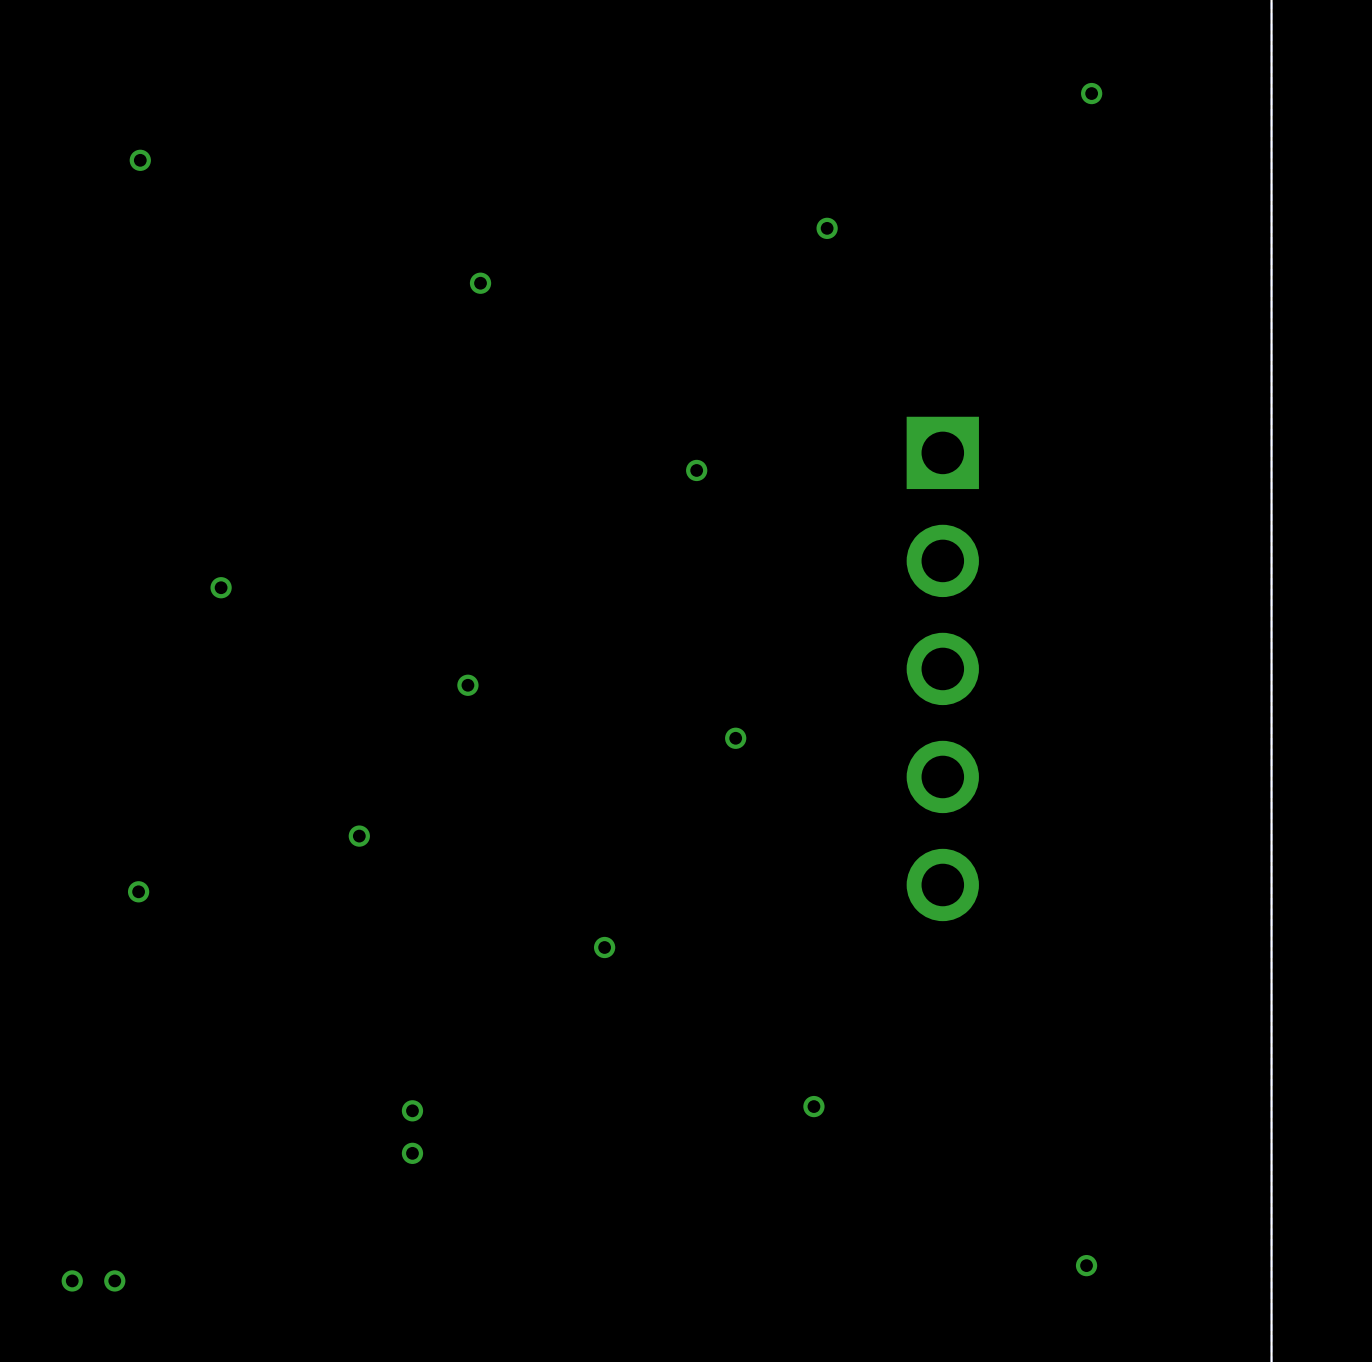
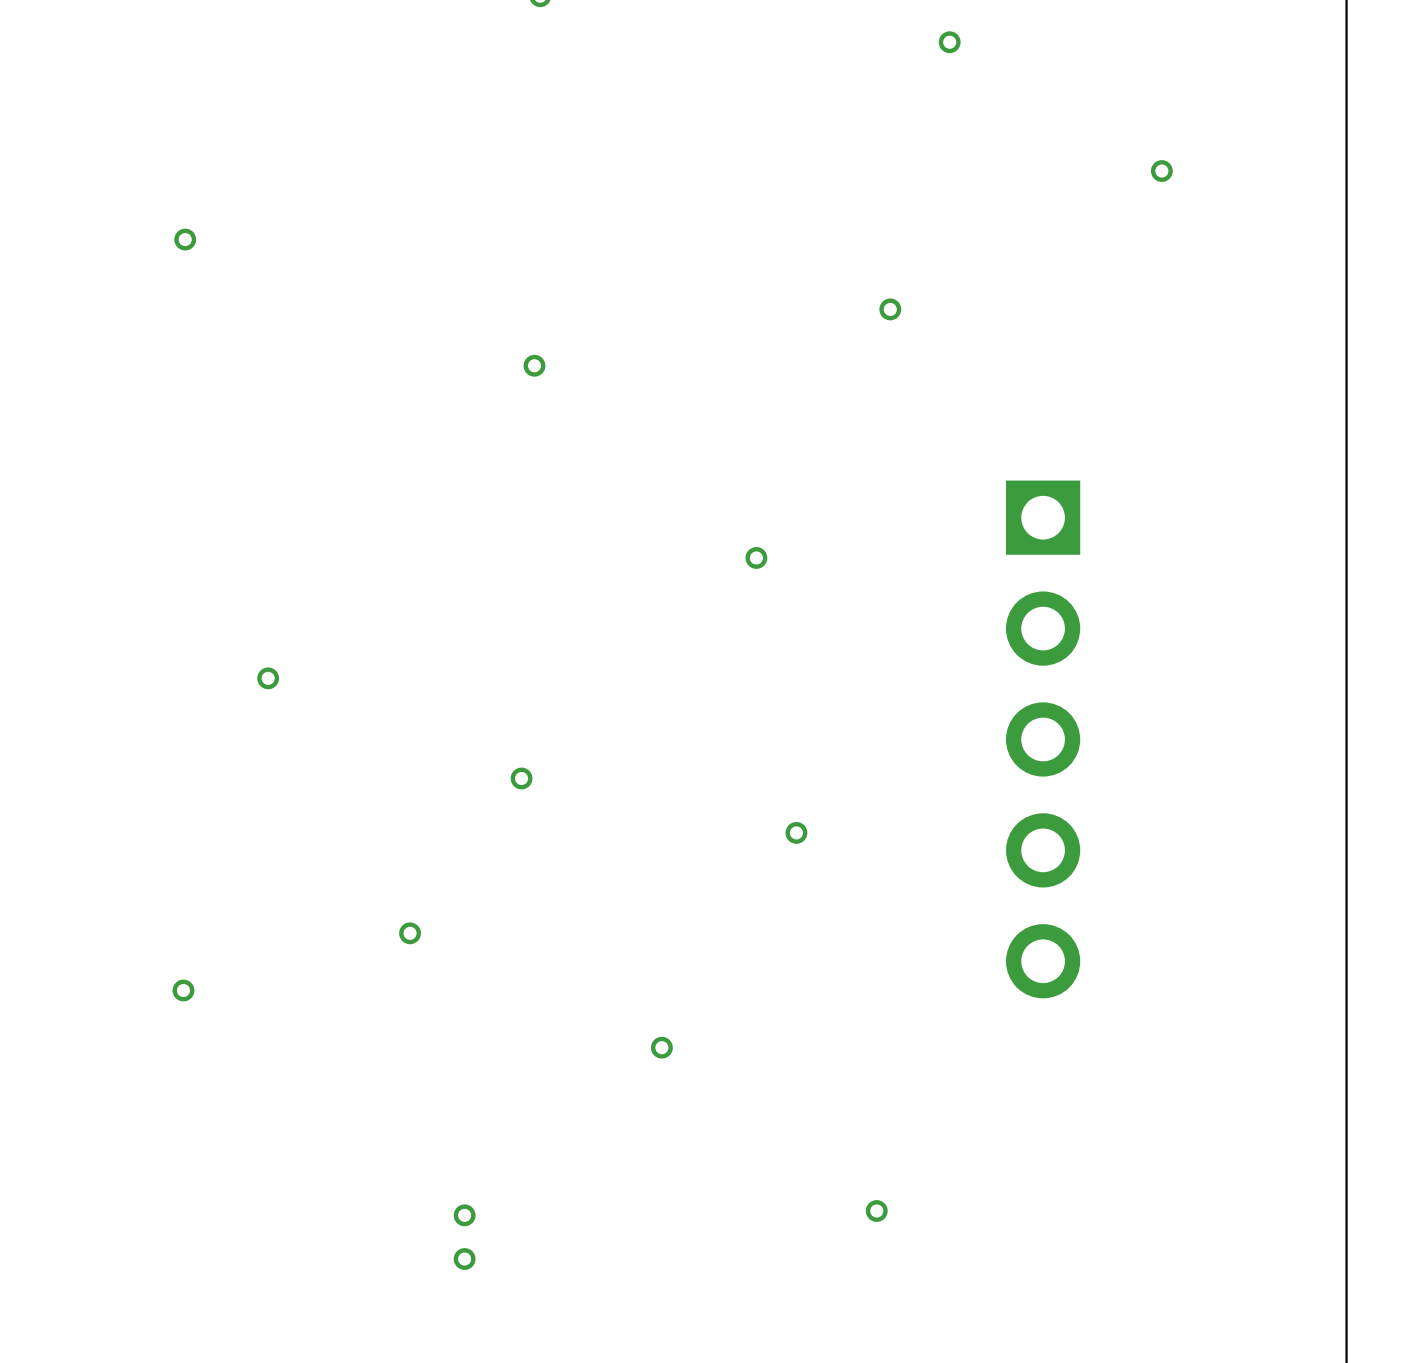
part position: (942, 668) -> (1043, 739)

